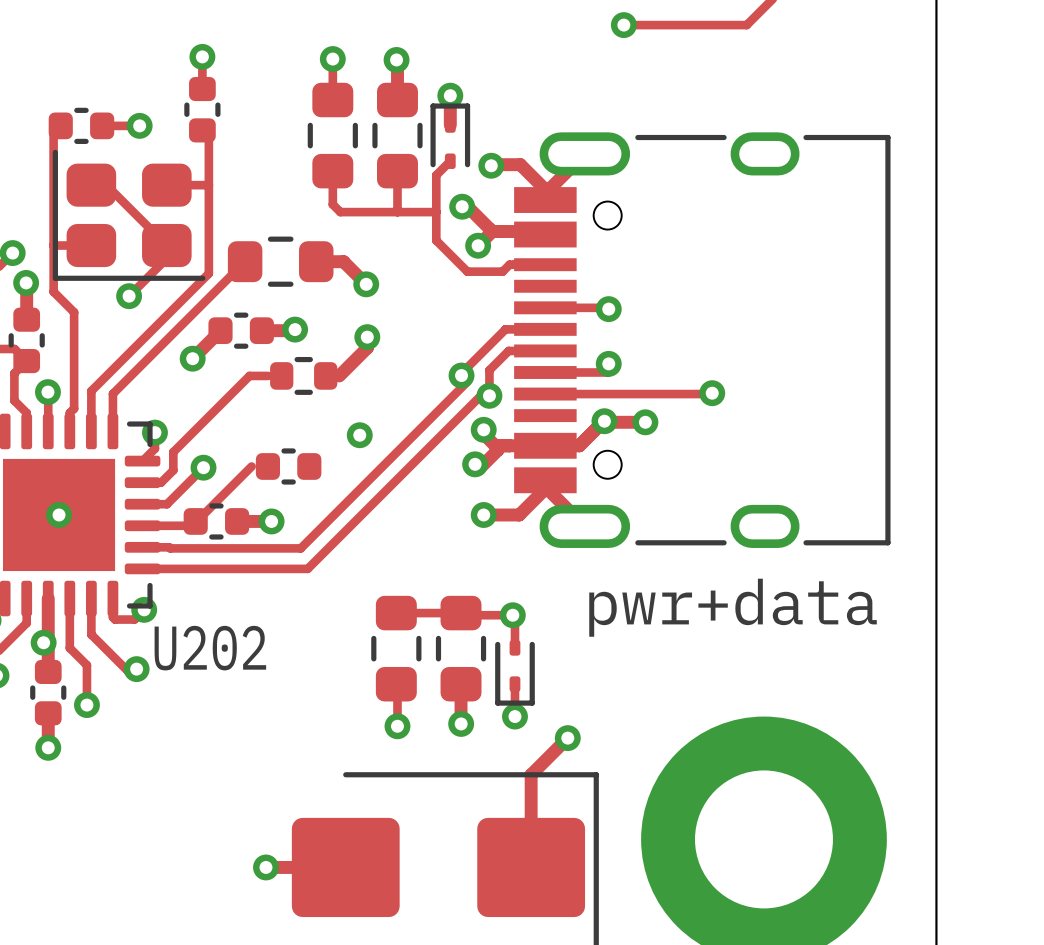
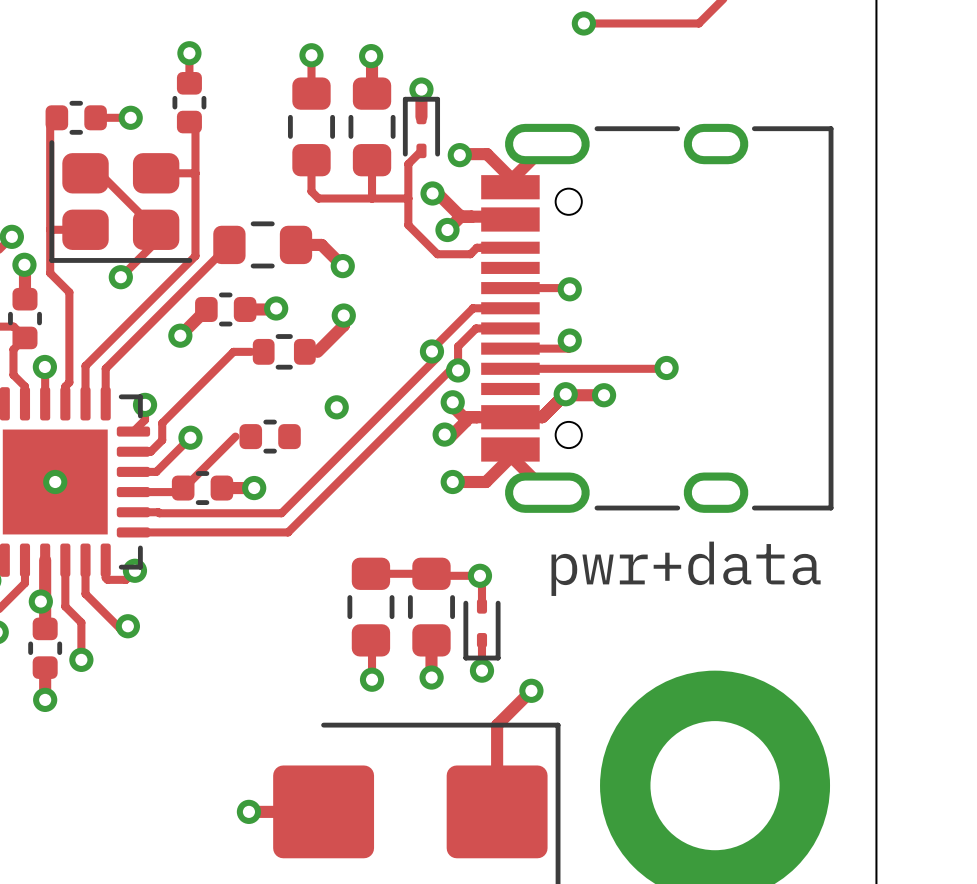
U202 name: U202 (210, 648) -> none

